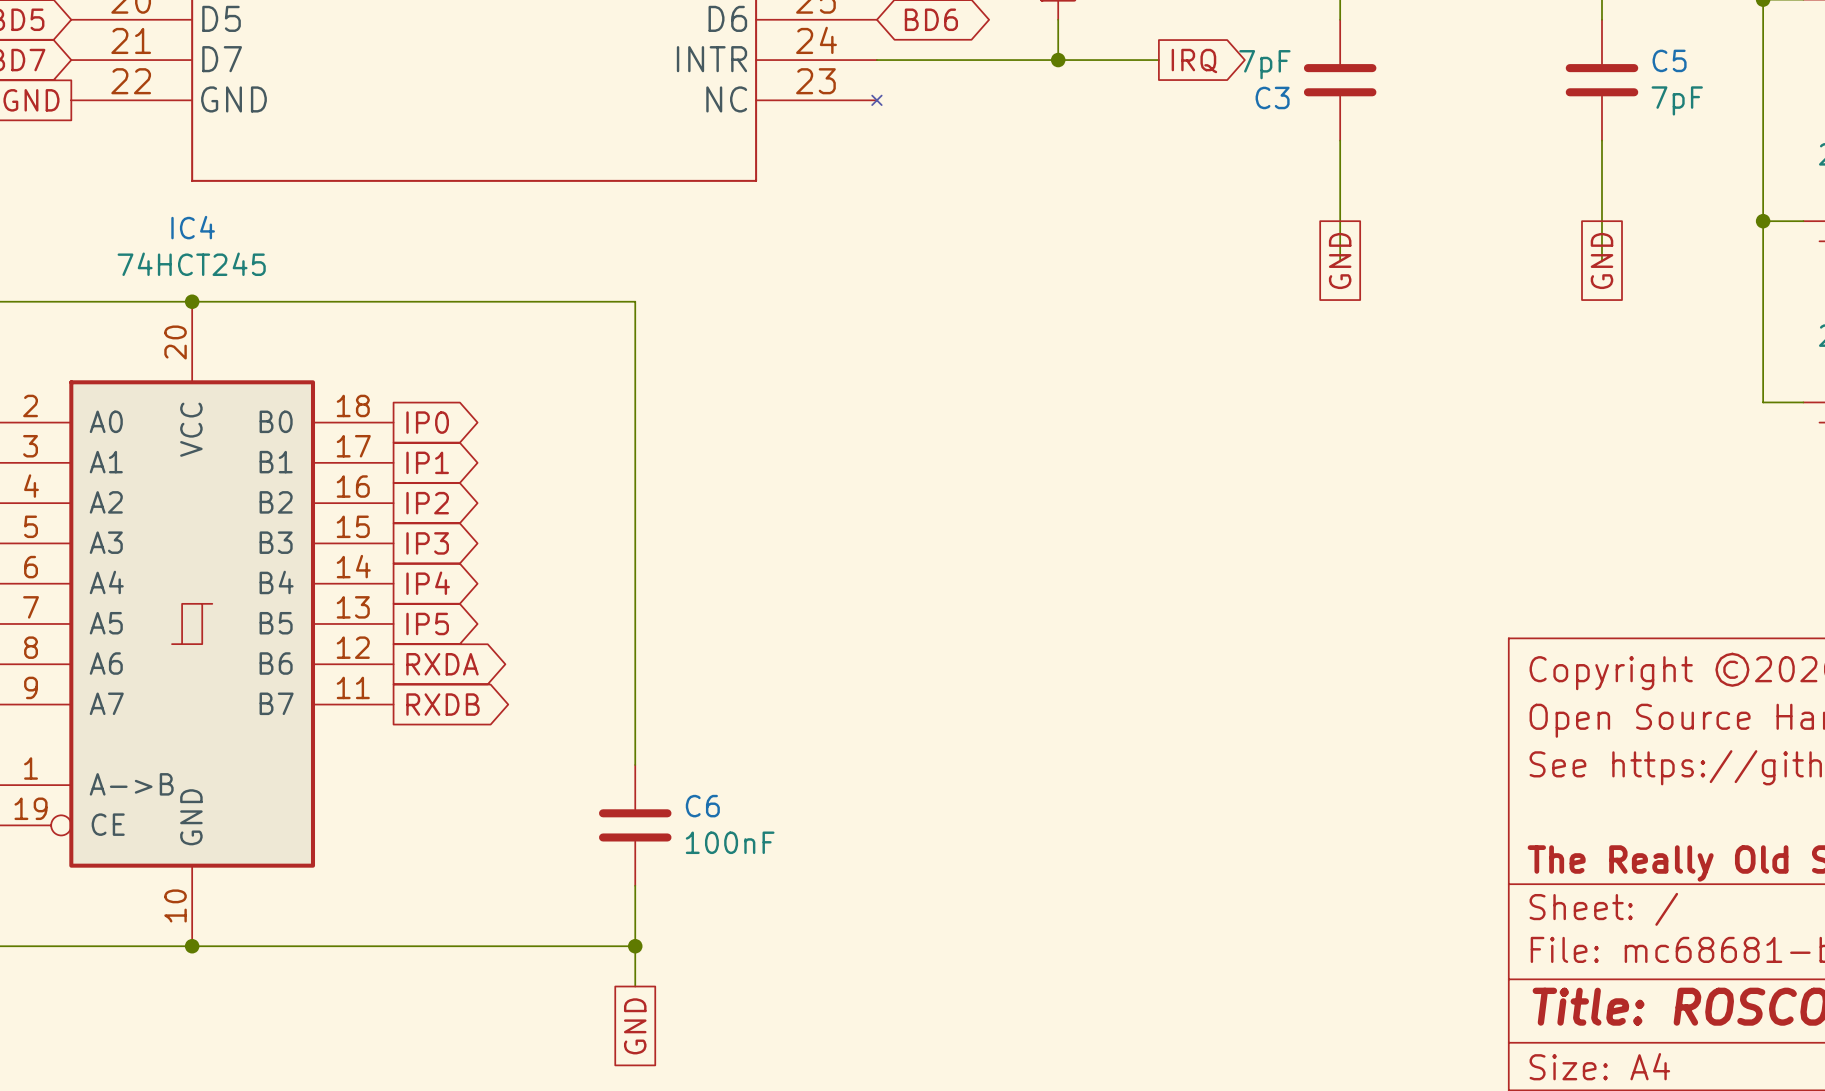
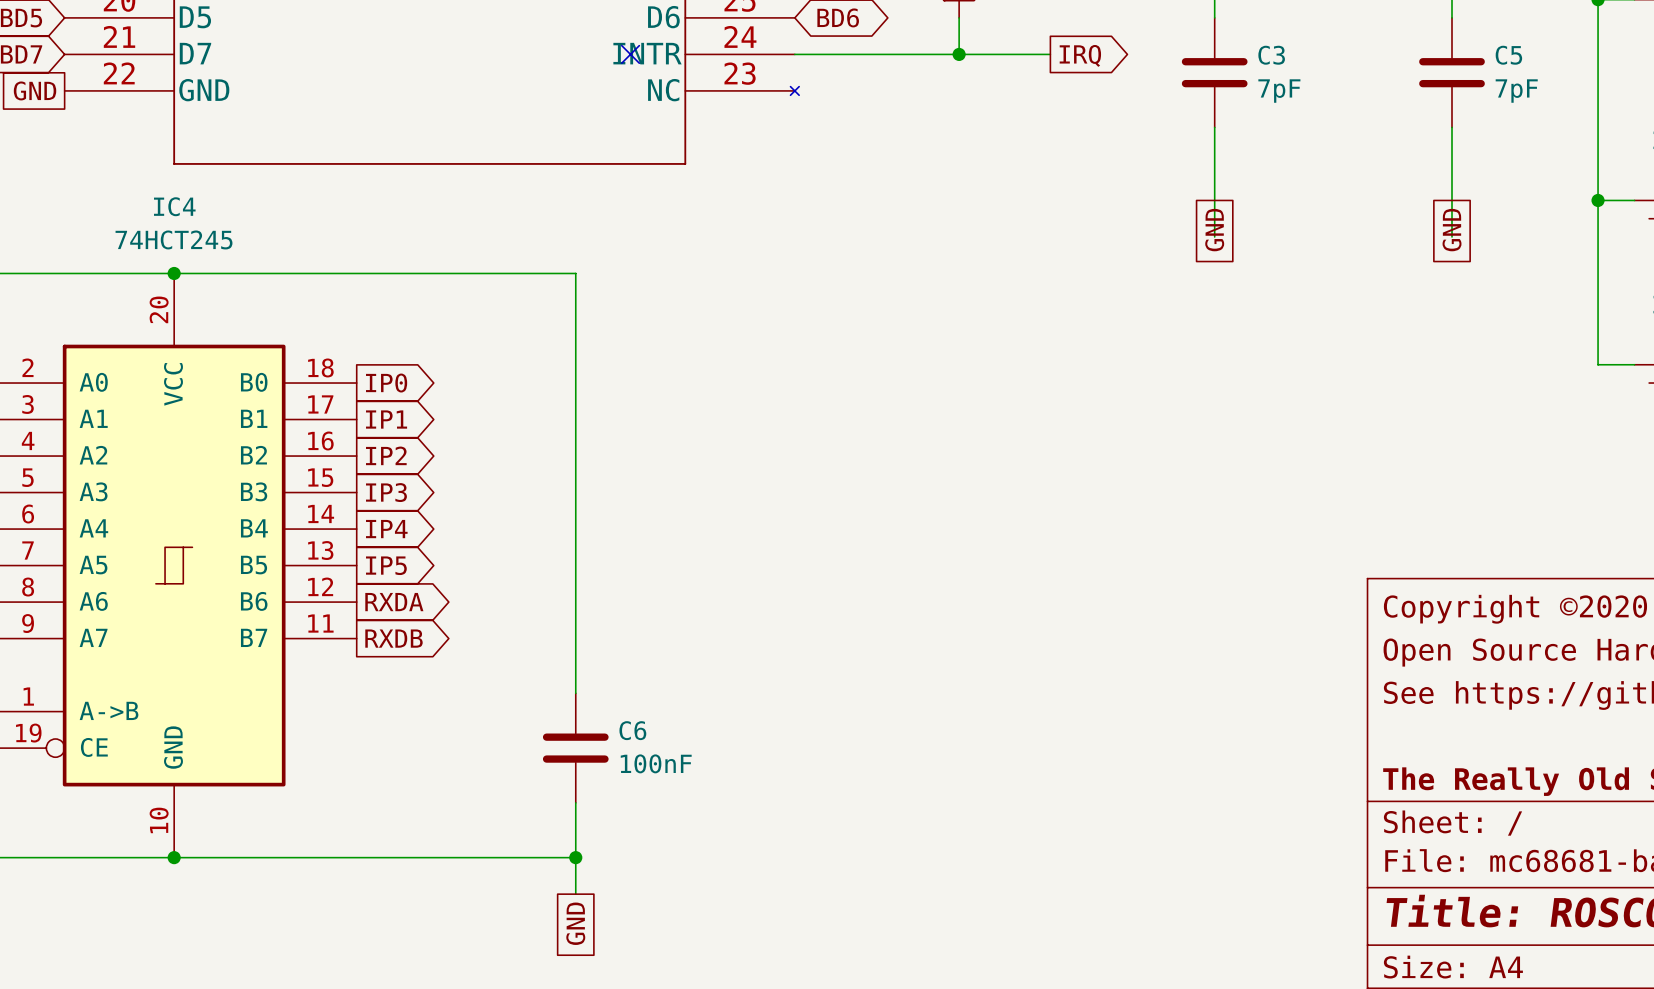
no-connect mark: none -> (630, 54)
C3 value position: 7pF (1264, 64) -> 7pF (1279, 91)
C3 name position: C3 (1272, 97) -> C3 (1271, 55)

